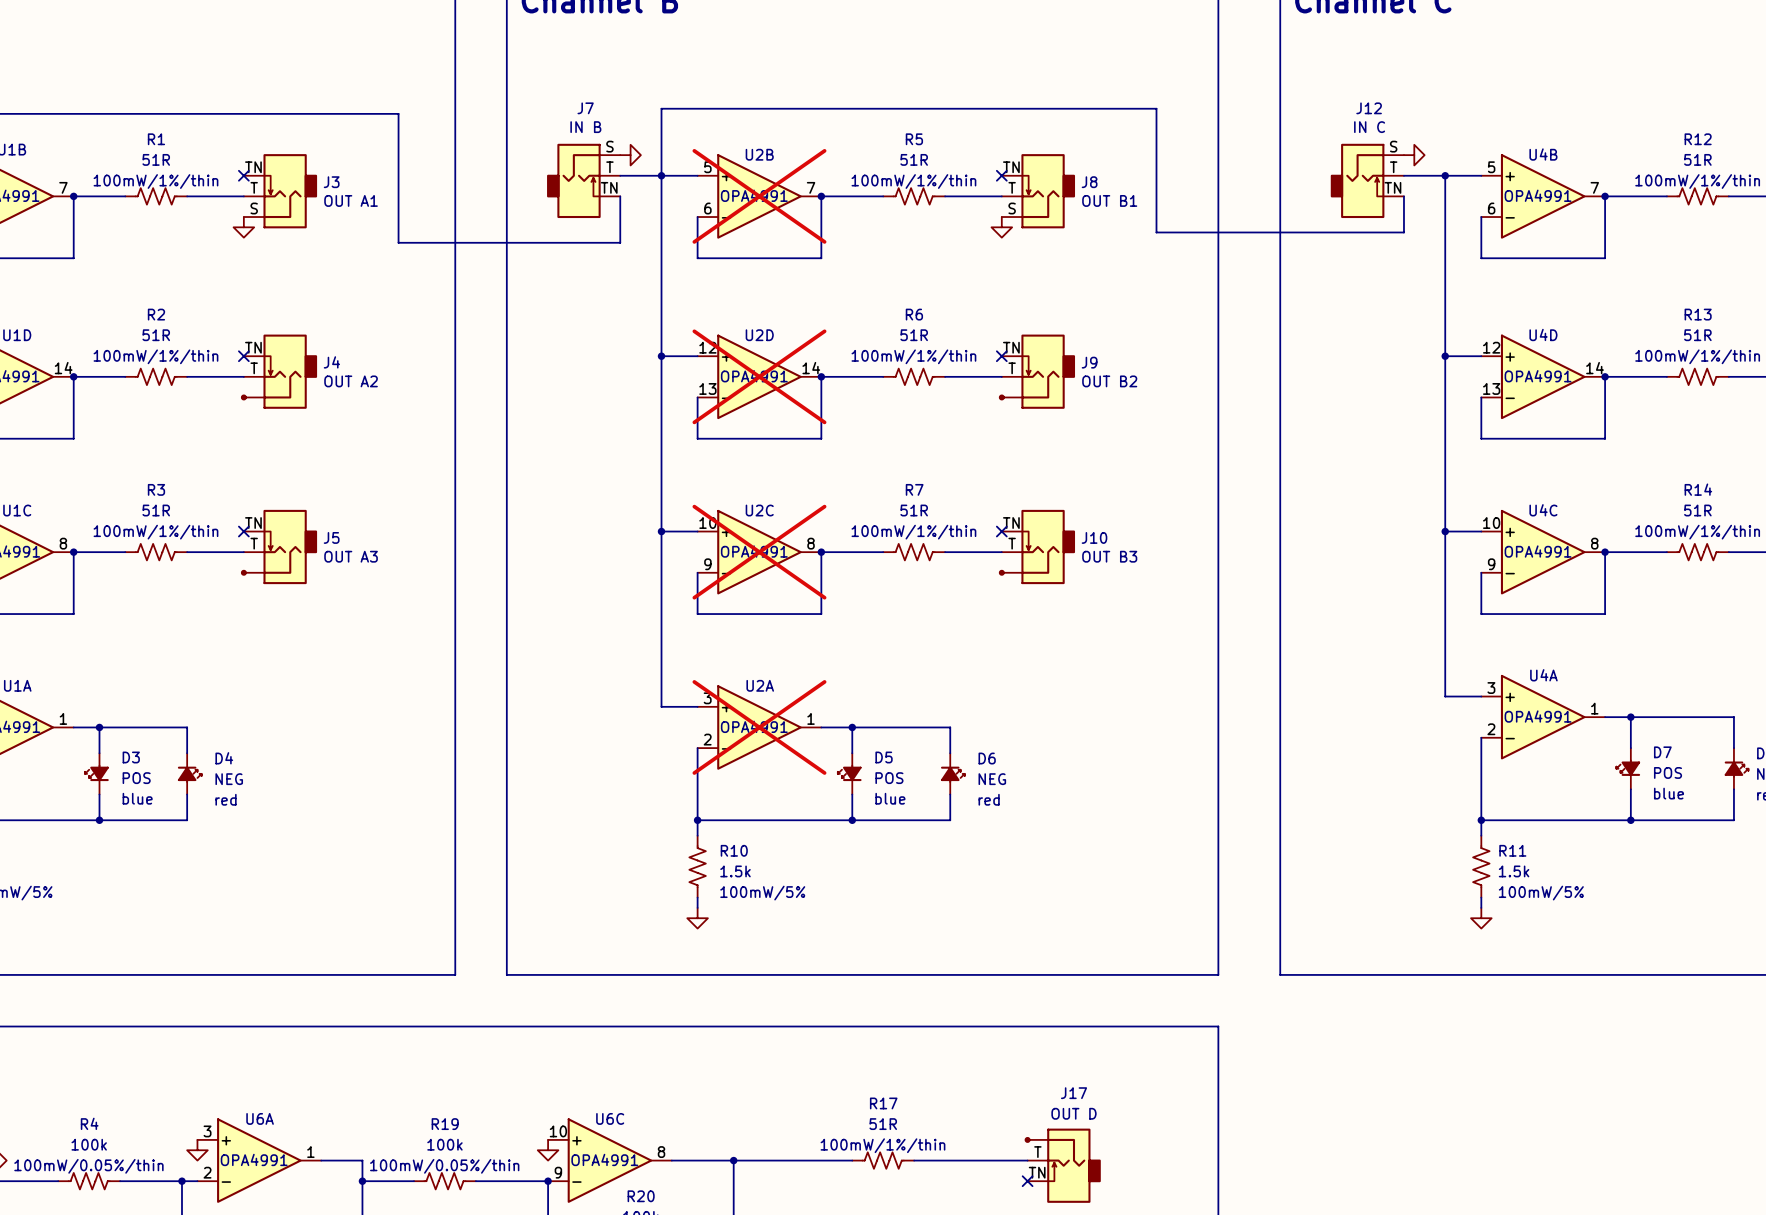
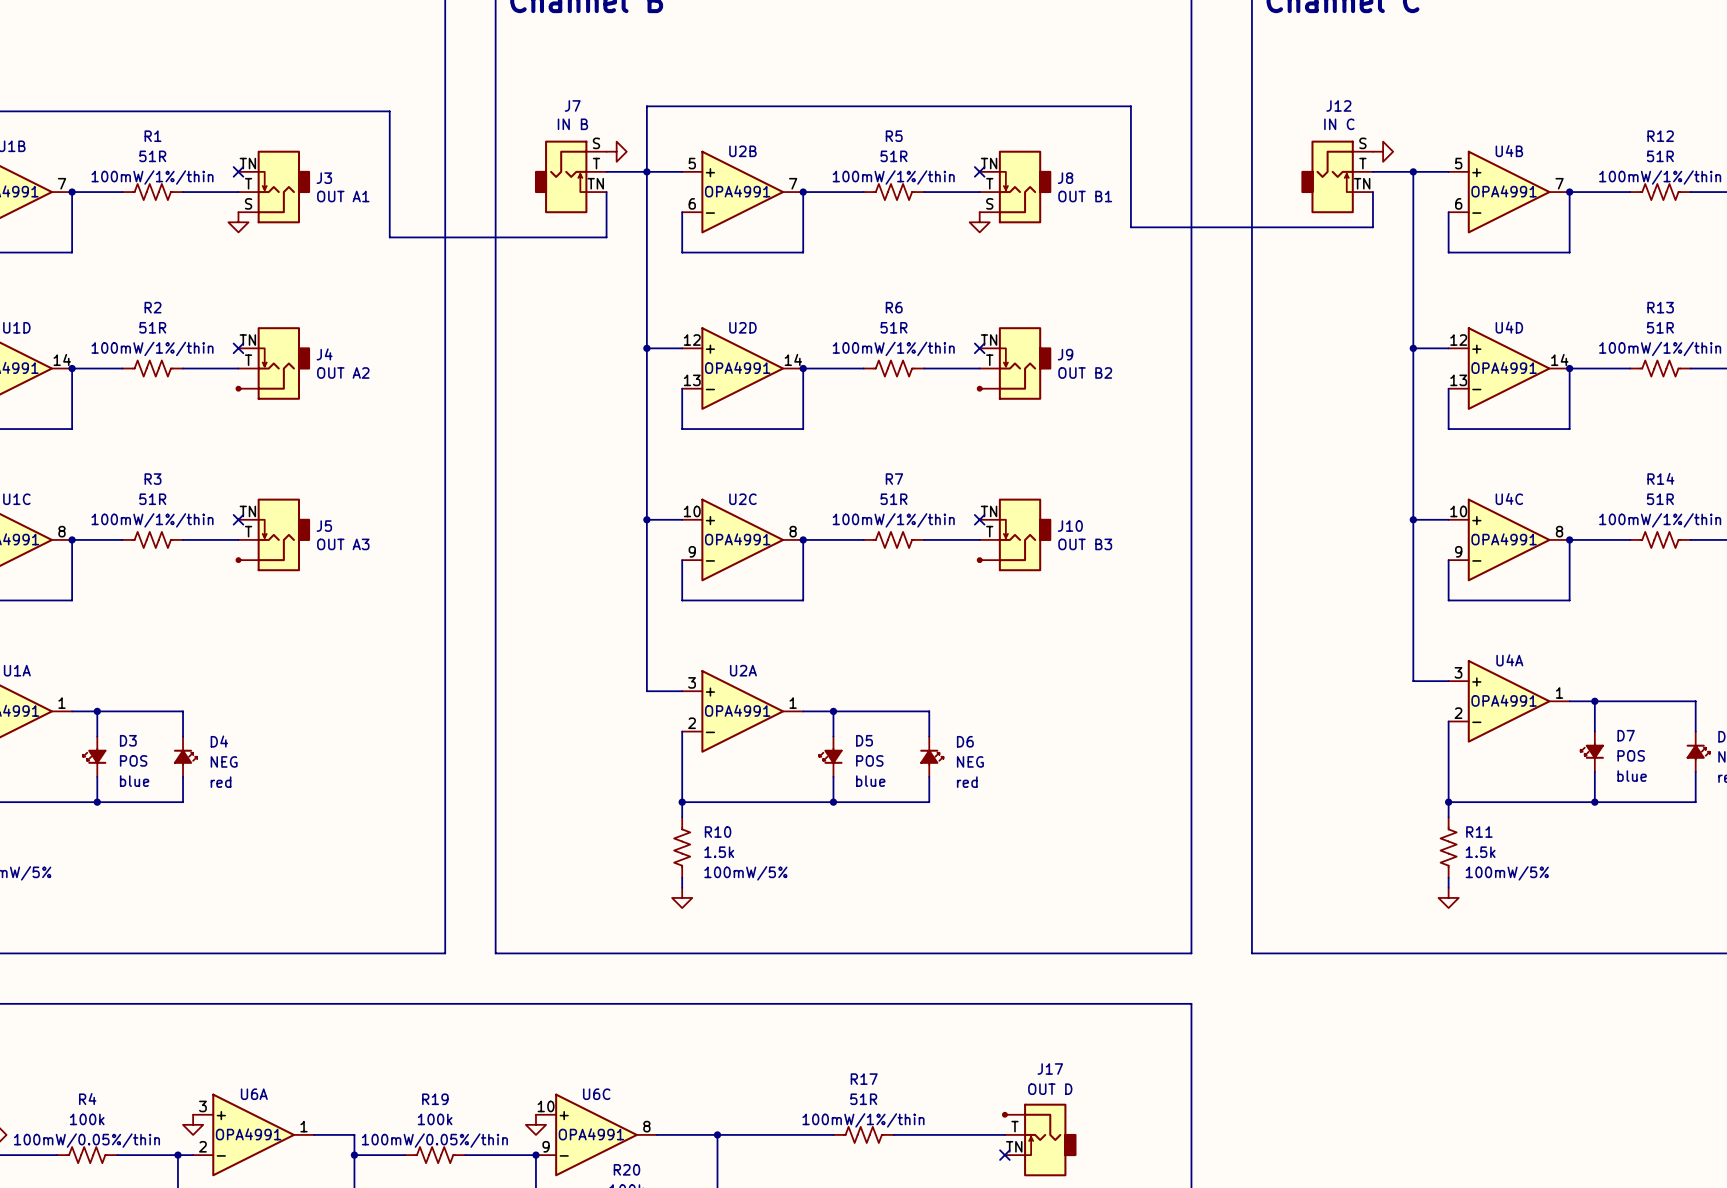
U2B do-not-place cross: (759, 196) -> none
U2D do-not-place cross: (759, 376) -> none
U2C do-not-place cross: (759, 552) -> none
U2A do-not-place cross: (759, 727) -> none

